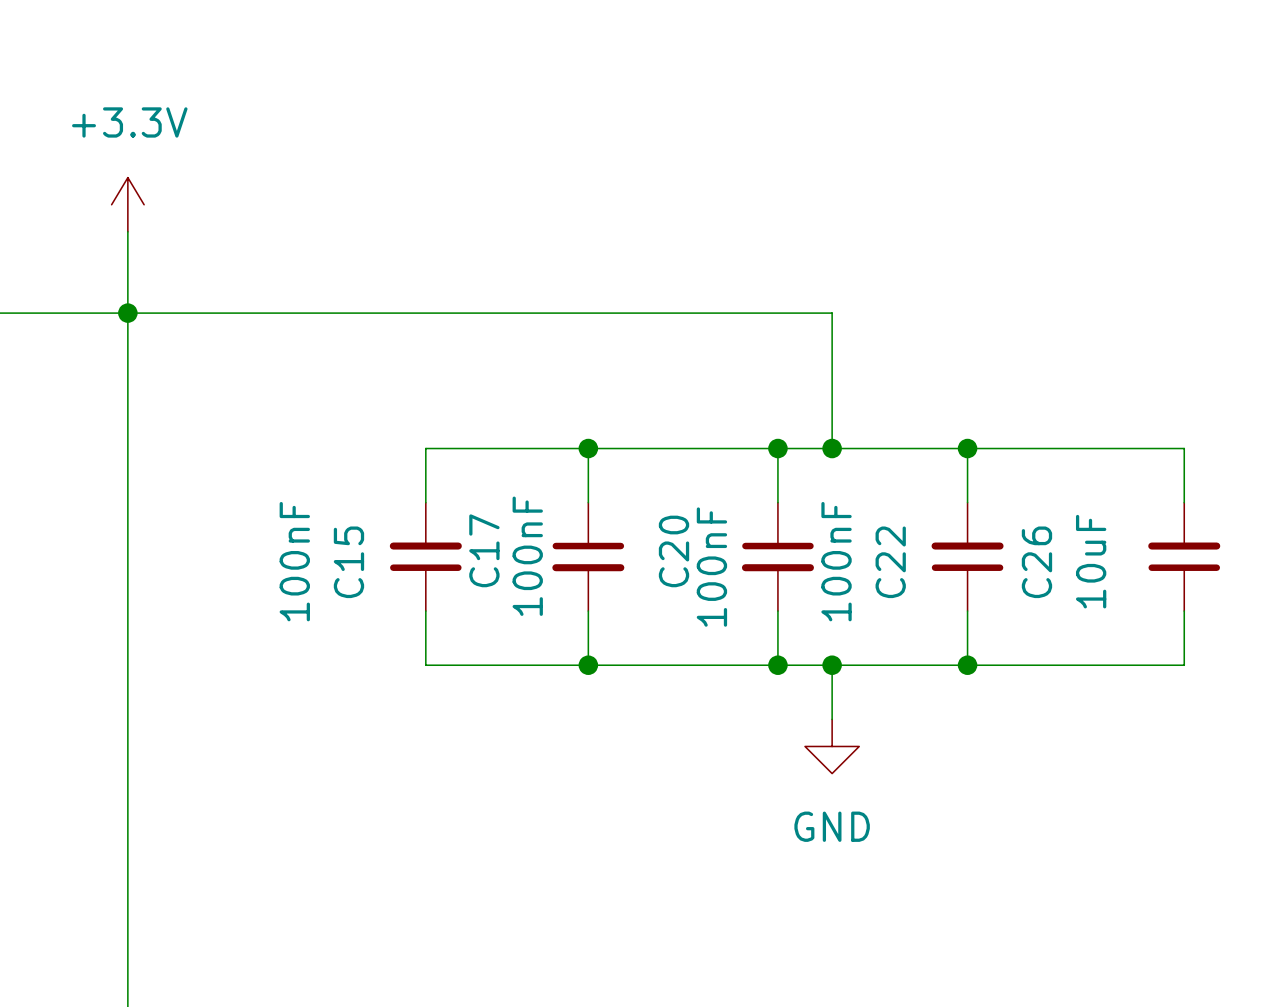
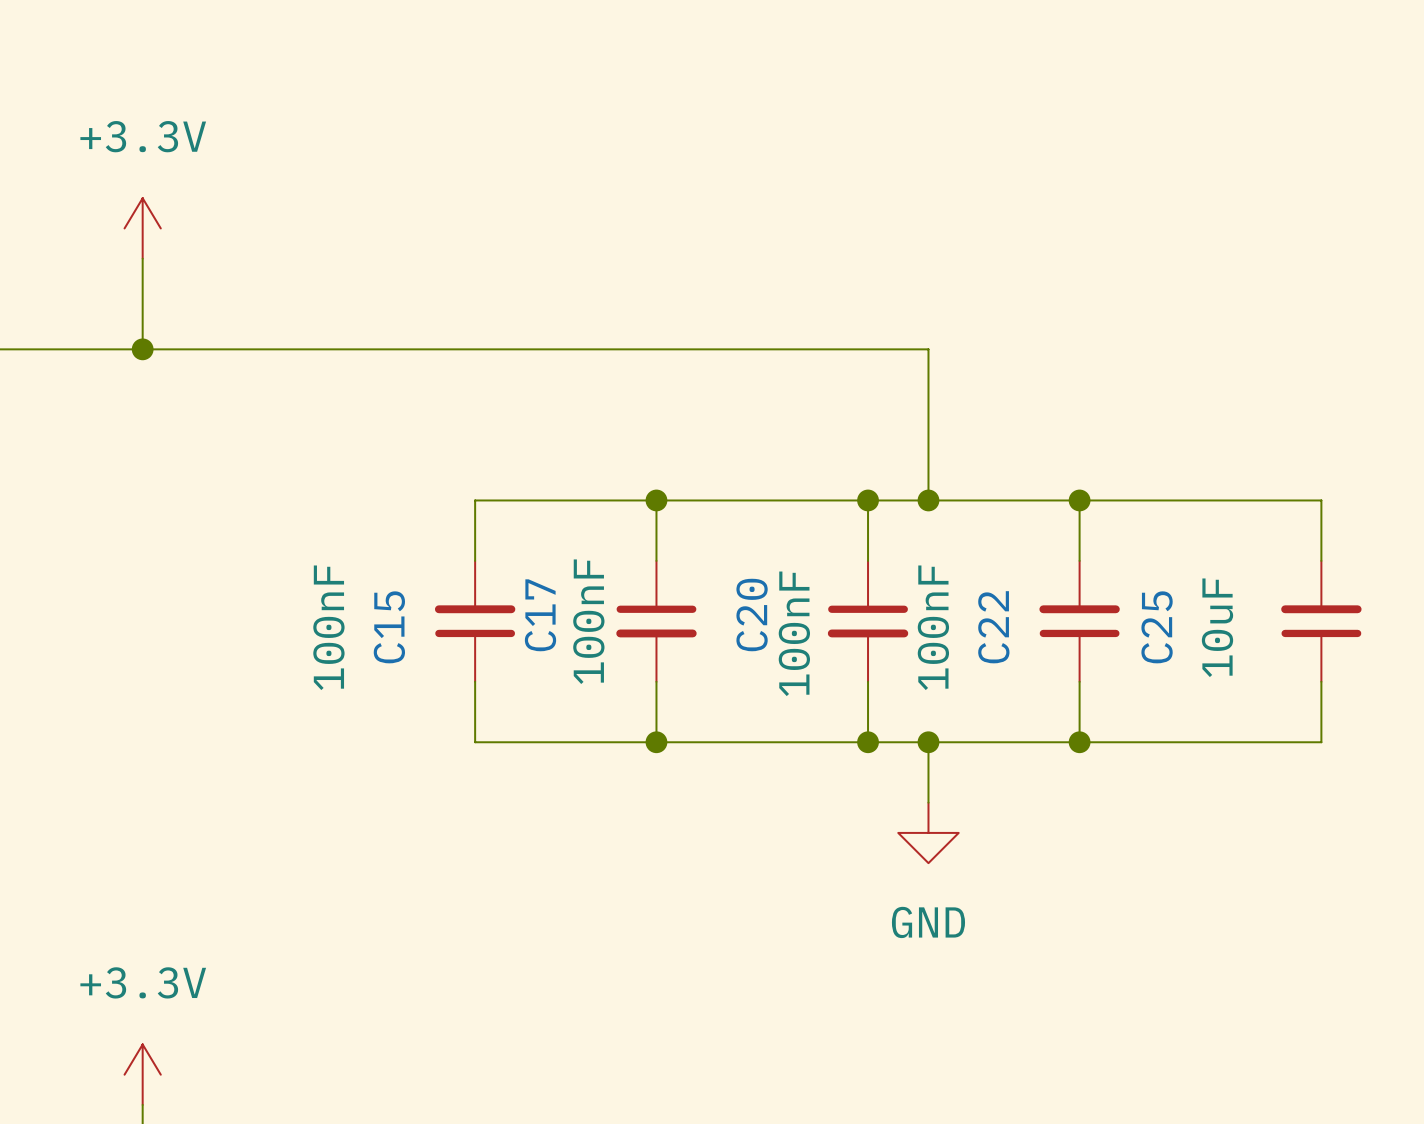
wire: (127, 313) (127, 990) -> none
C26 name: C26 (1036, 562) -> C25 (1157, 627)
power symbol: none -> +3.3V (142, 1074)

